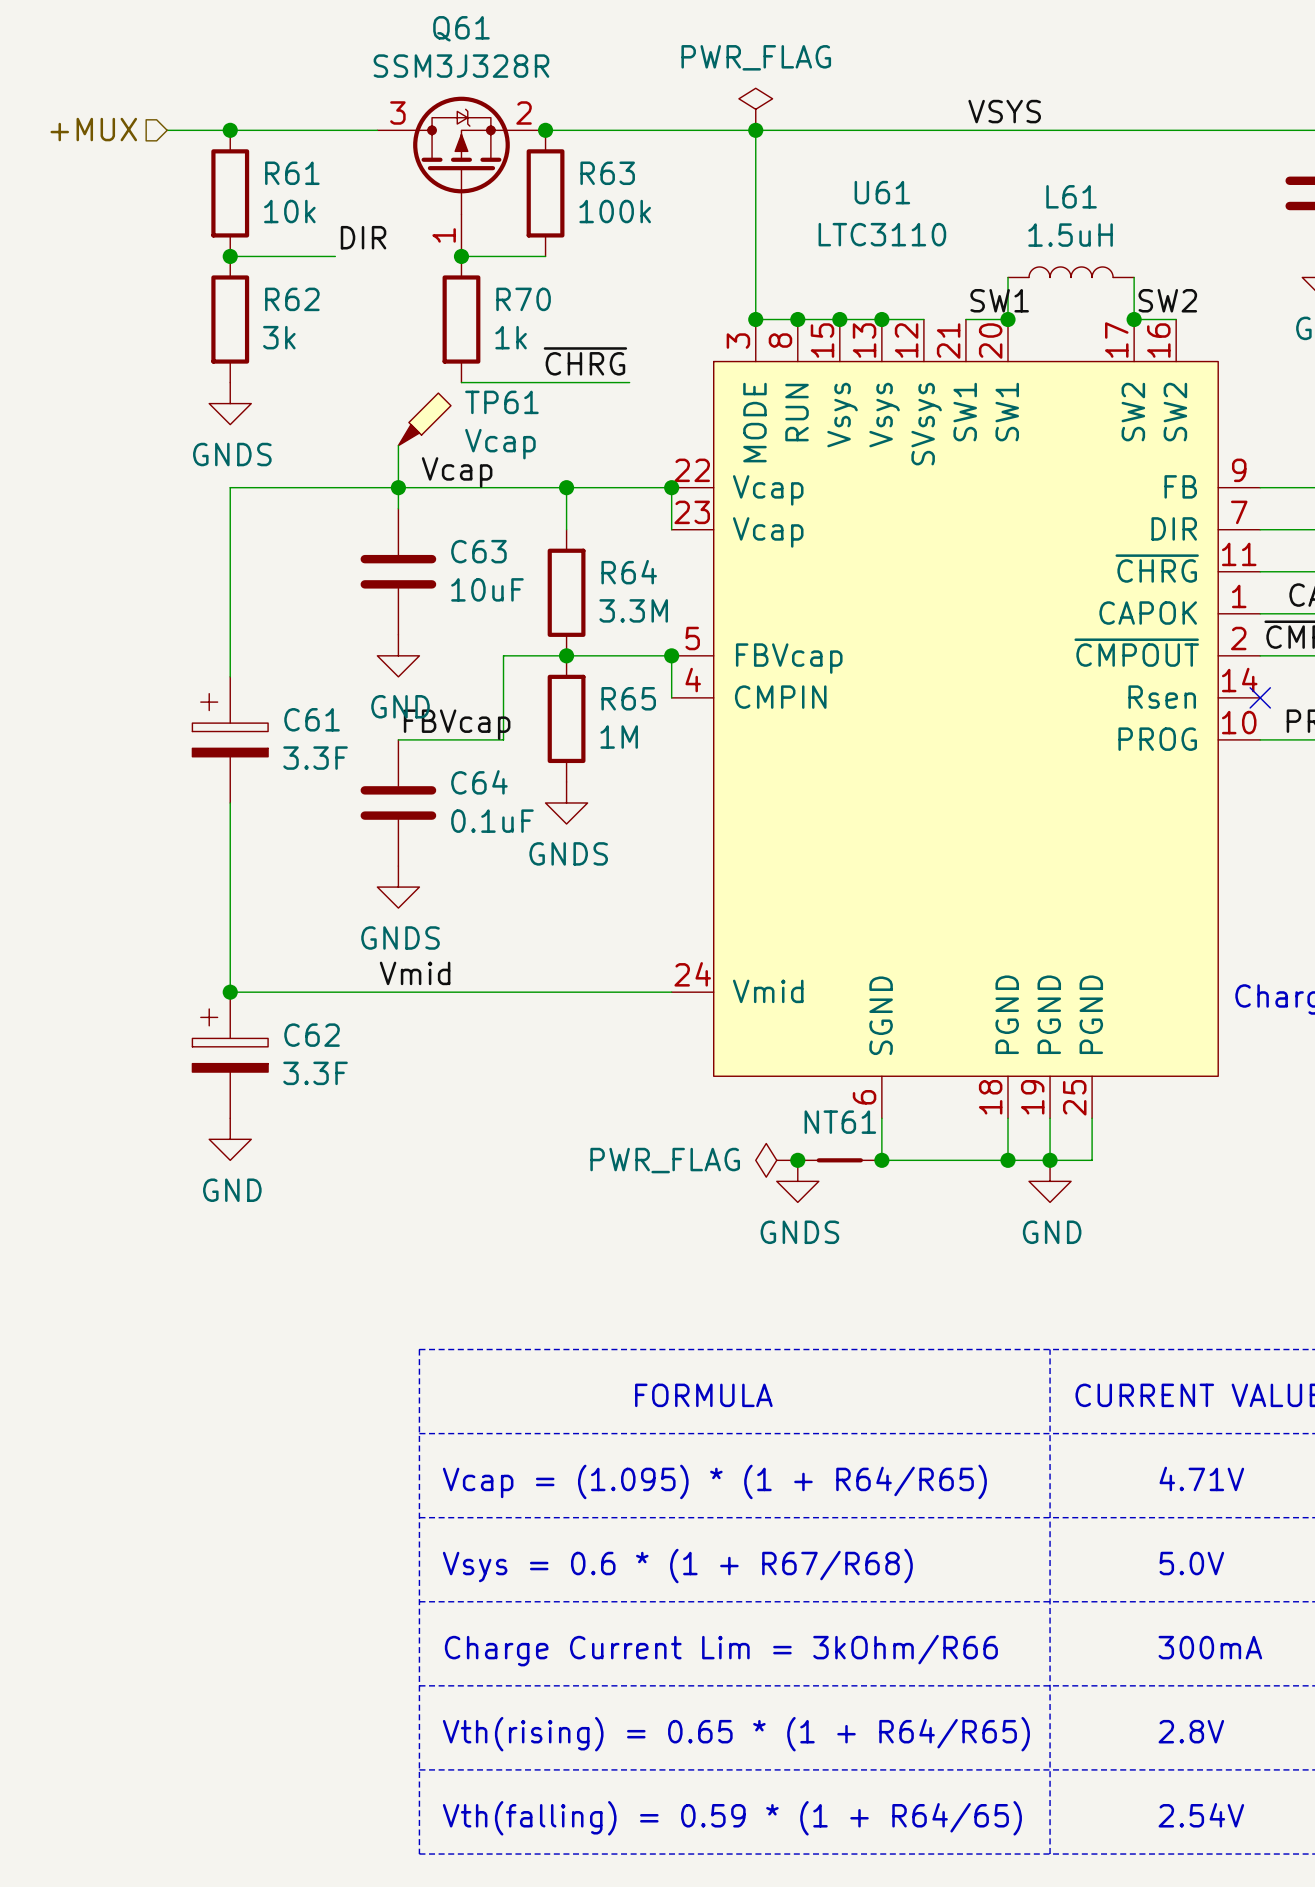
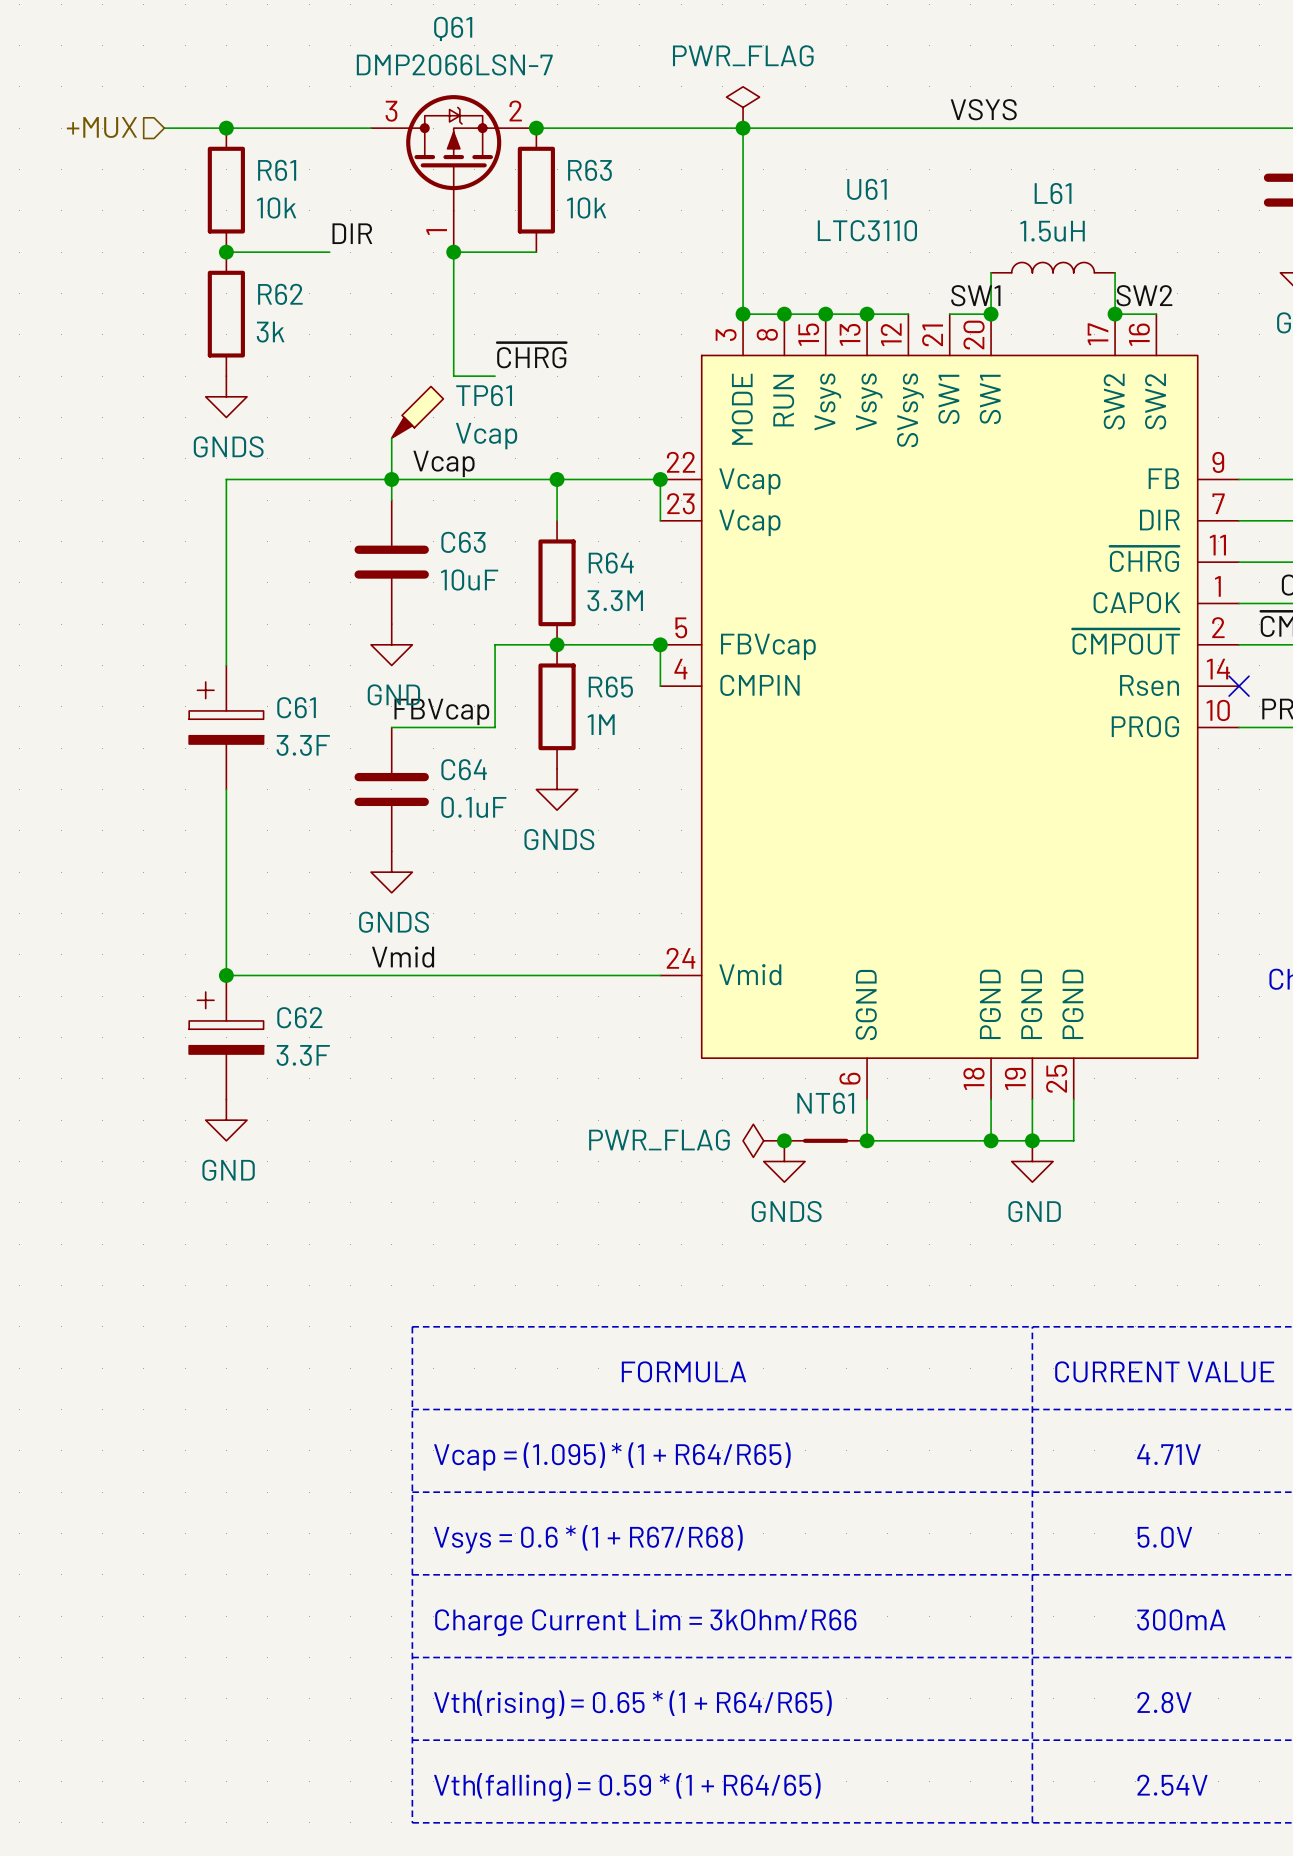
Q61 value: SSM3J328R (461, 66) -> DMP2066LSN-7 (454, 64)
R63 value: 100k (615, 211) -> 10k (586, 207)
wire: none -> (453, 252) (453, 376)
R70: 1k (461, 319) -> none
label position: ~{CHRG} (585, 361) -> ~{CHRG} (531, 355)
wire: (503, 382) (629, 382) -> none

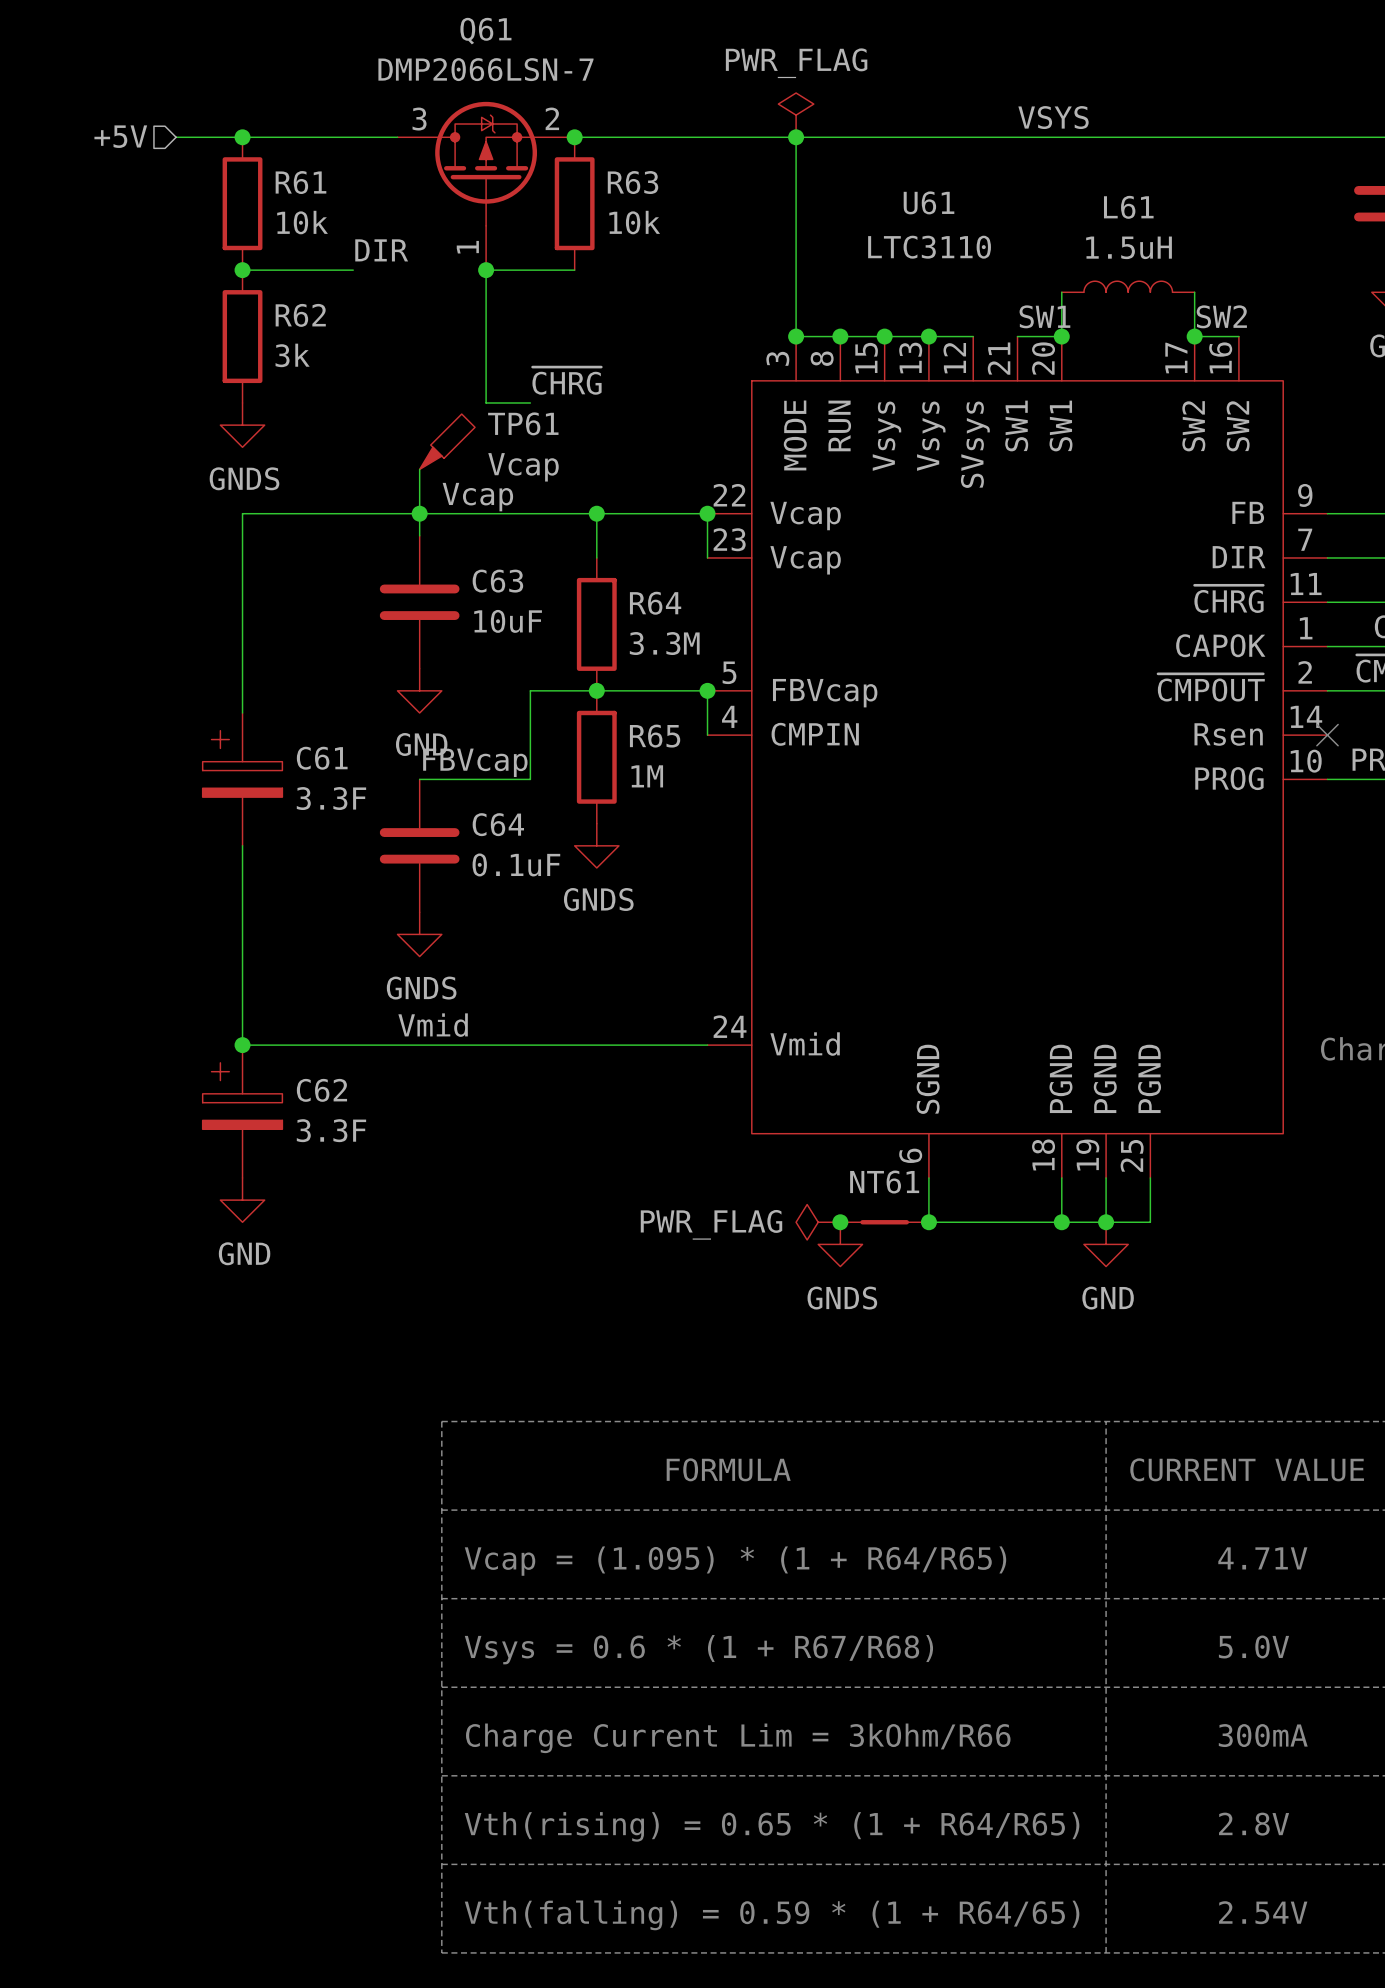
hierarchical label: +MUX (101, 127) -> +5V (120, 136)

